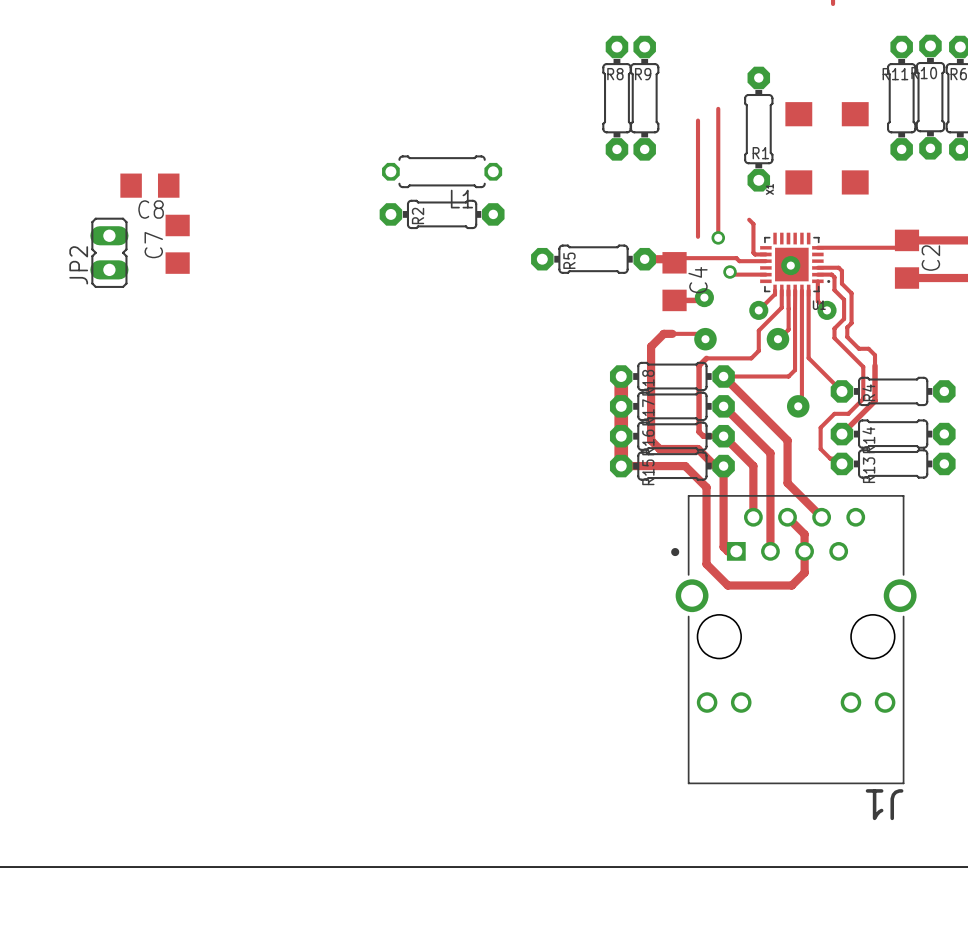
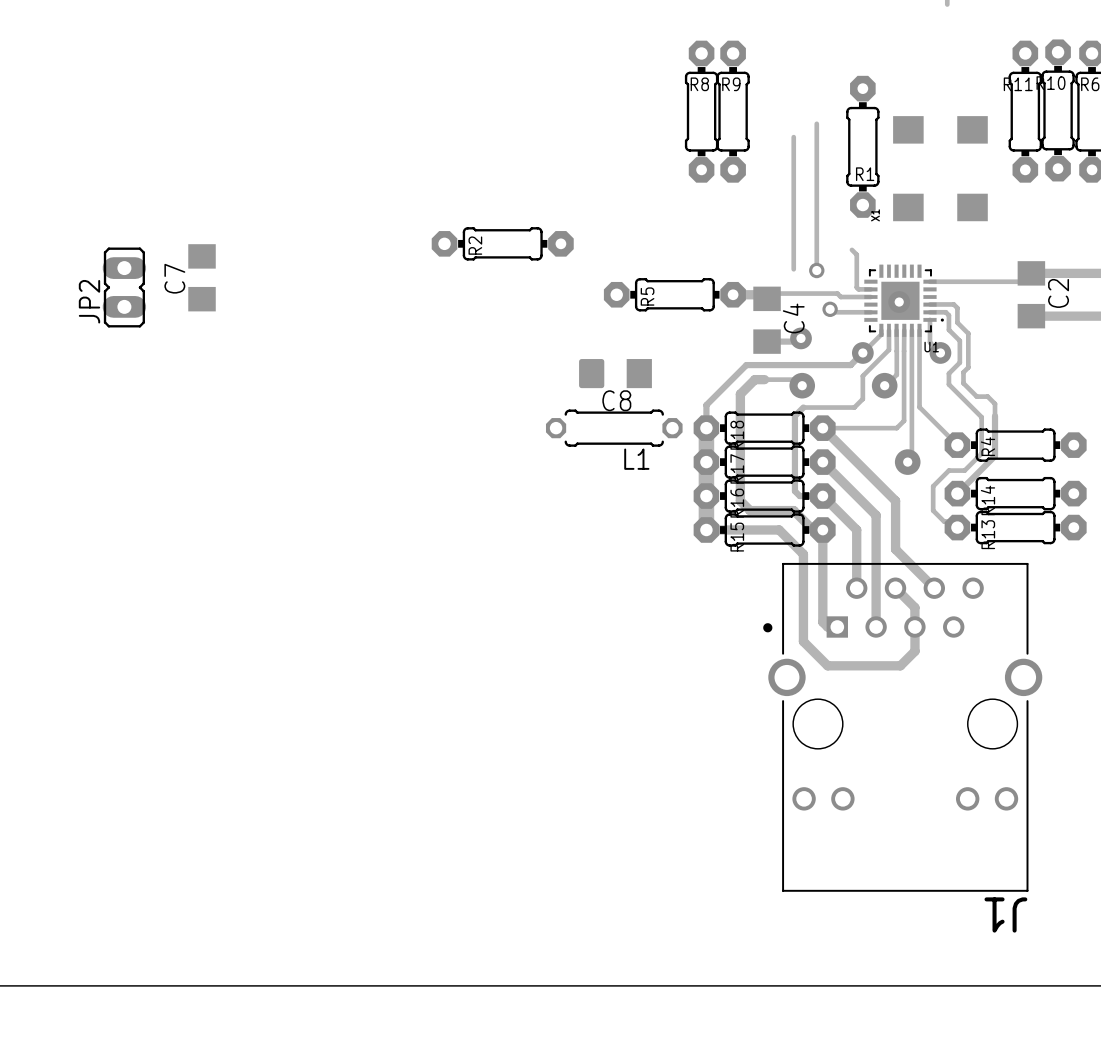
L1 position: (442, 171) -> (614, 428)
C8 footprint: [120, 173, 180, 198] -> [579, 359, 652, 389]
track: none -> (862, 352) (850, 365) (746, 365) (706, 405) (706, 428)

